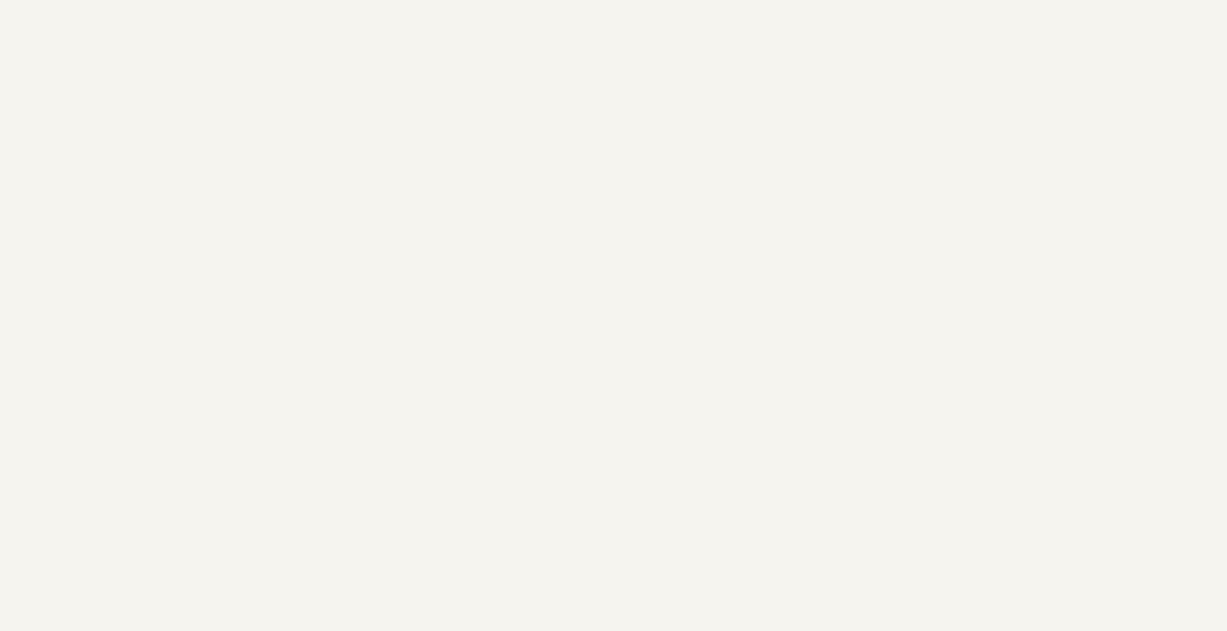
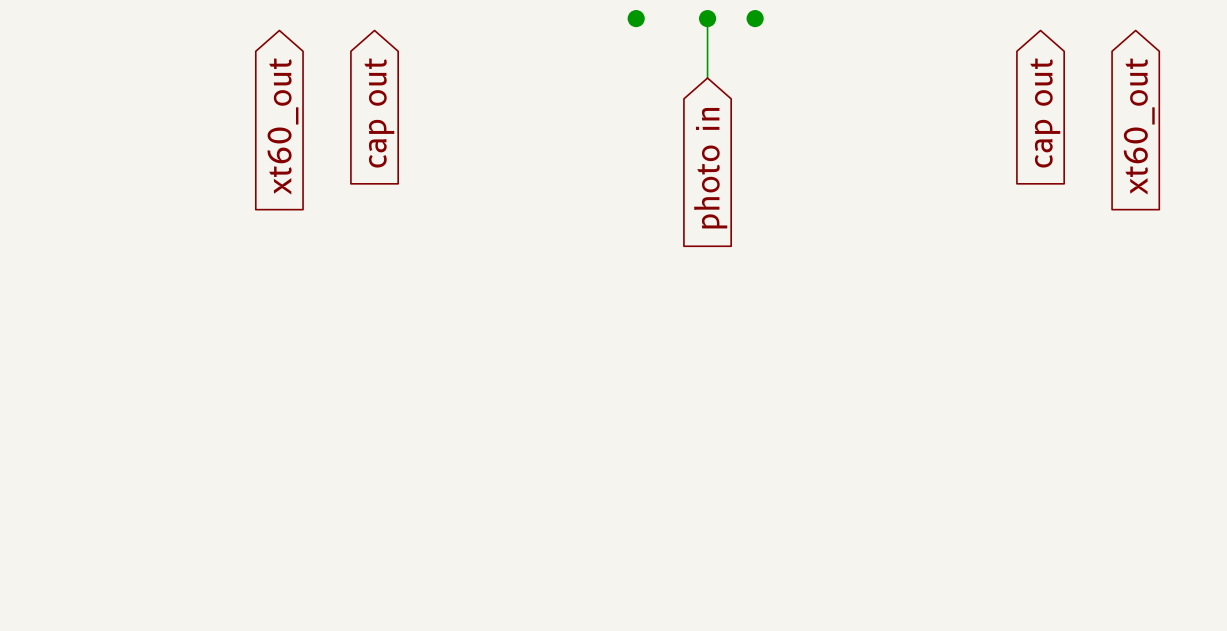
junction: none -> (636, 18)
wire: none -> (707, 18) (707, 78)
junction: none -> (707, 18)
junction: none -> (755, 18)
global label: none -> cap out (379, 112)
global label: none -> cap out (1045, 112)
global label: none -> xt60_out (282, 126)
global label: none -> xt60_out (1139, 126)
global label: none -> photo in (710, 168)

